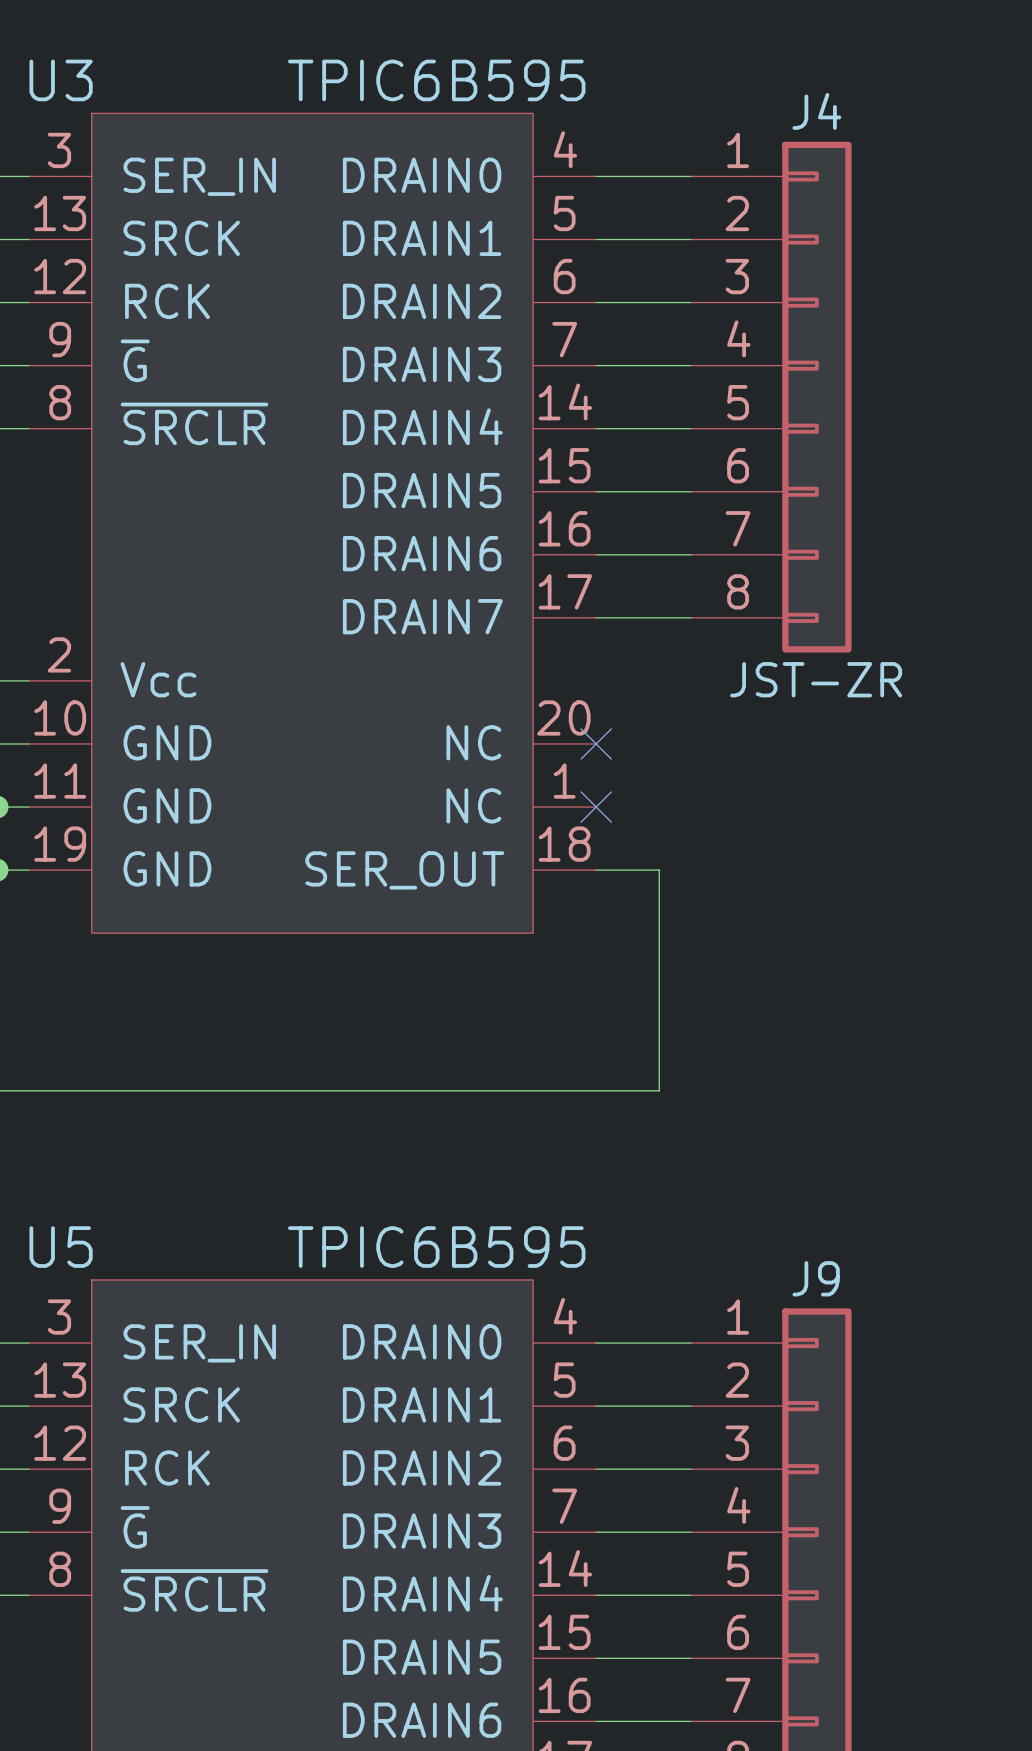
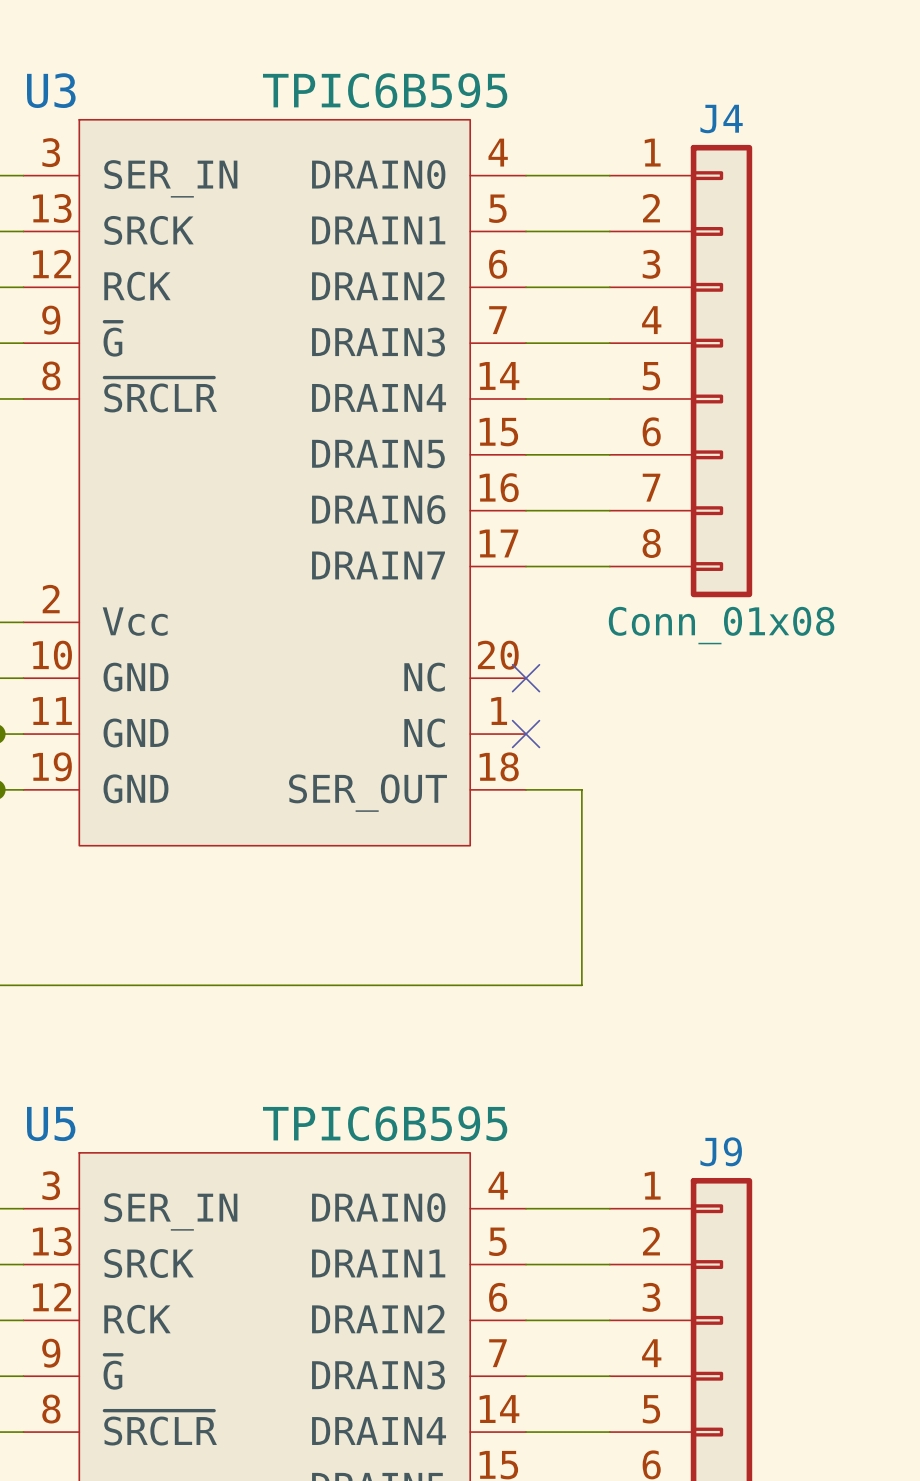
J4 value: JST-ZR (816, 679) -> Conn_01x08 (721, 625)

